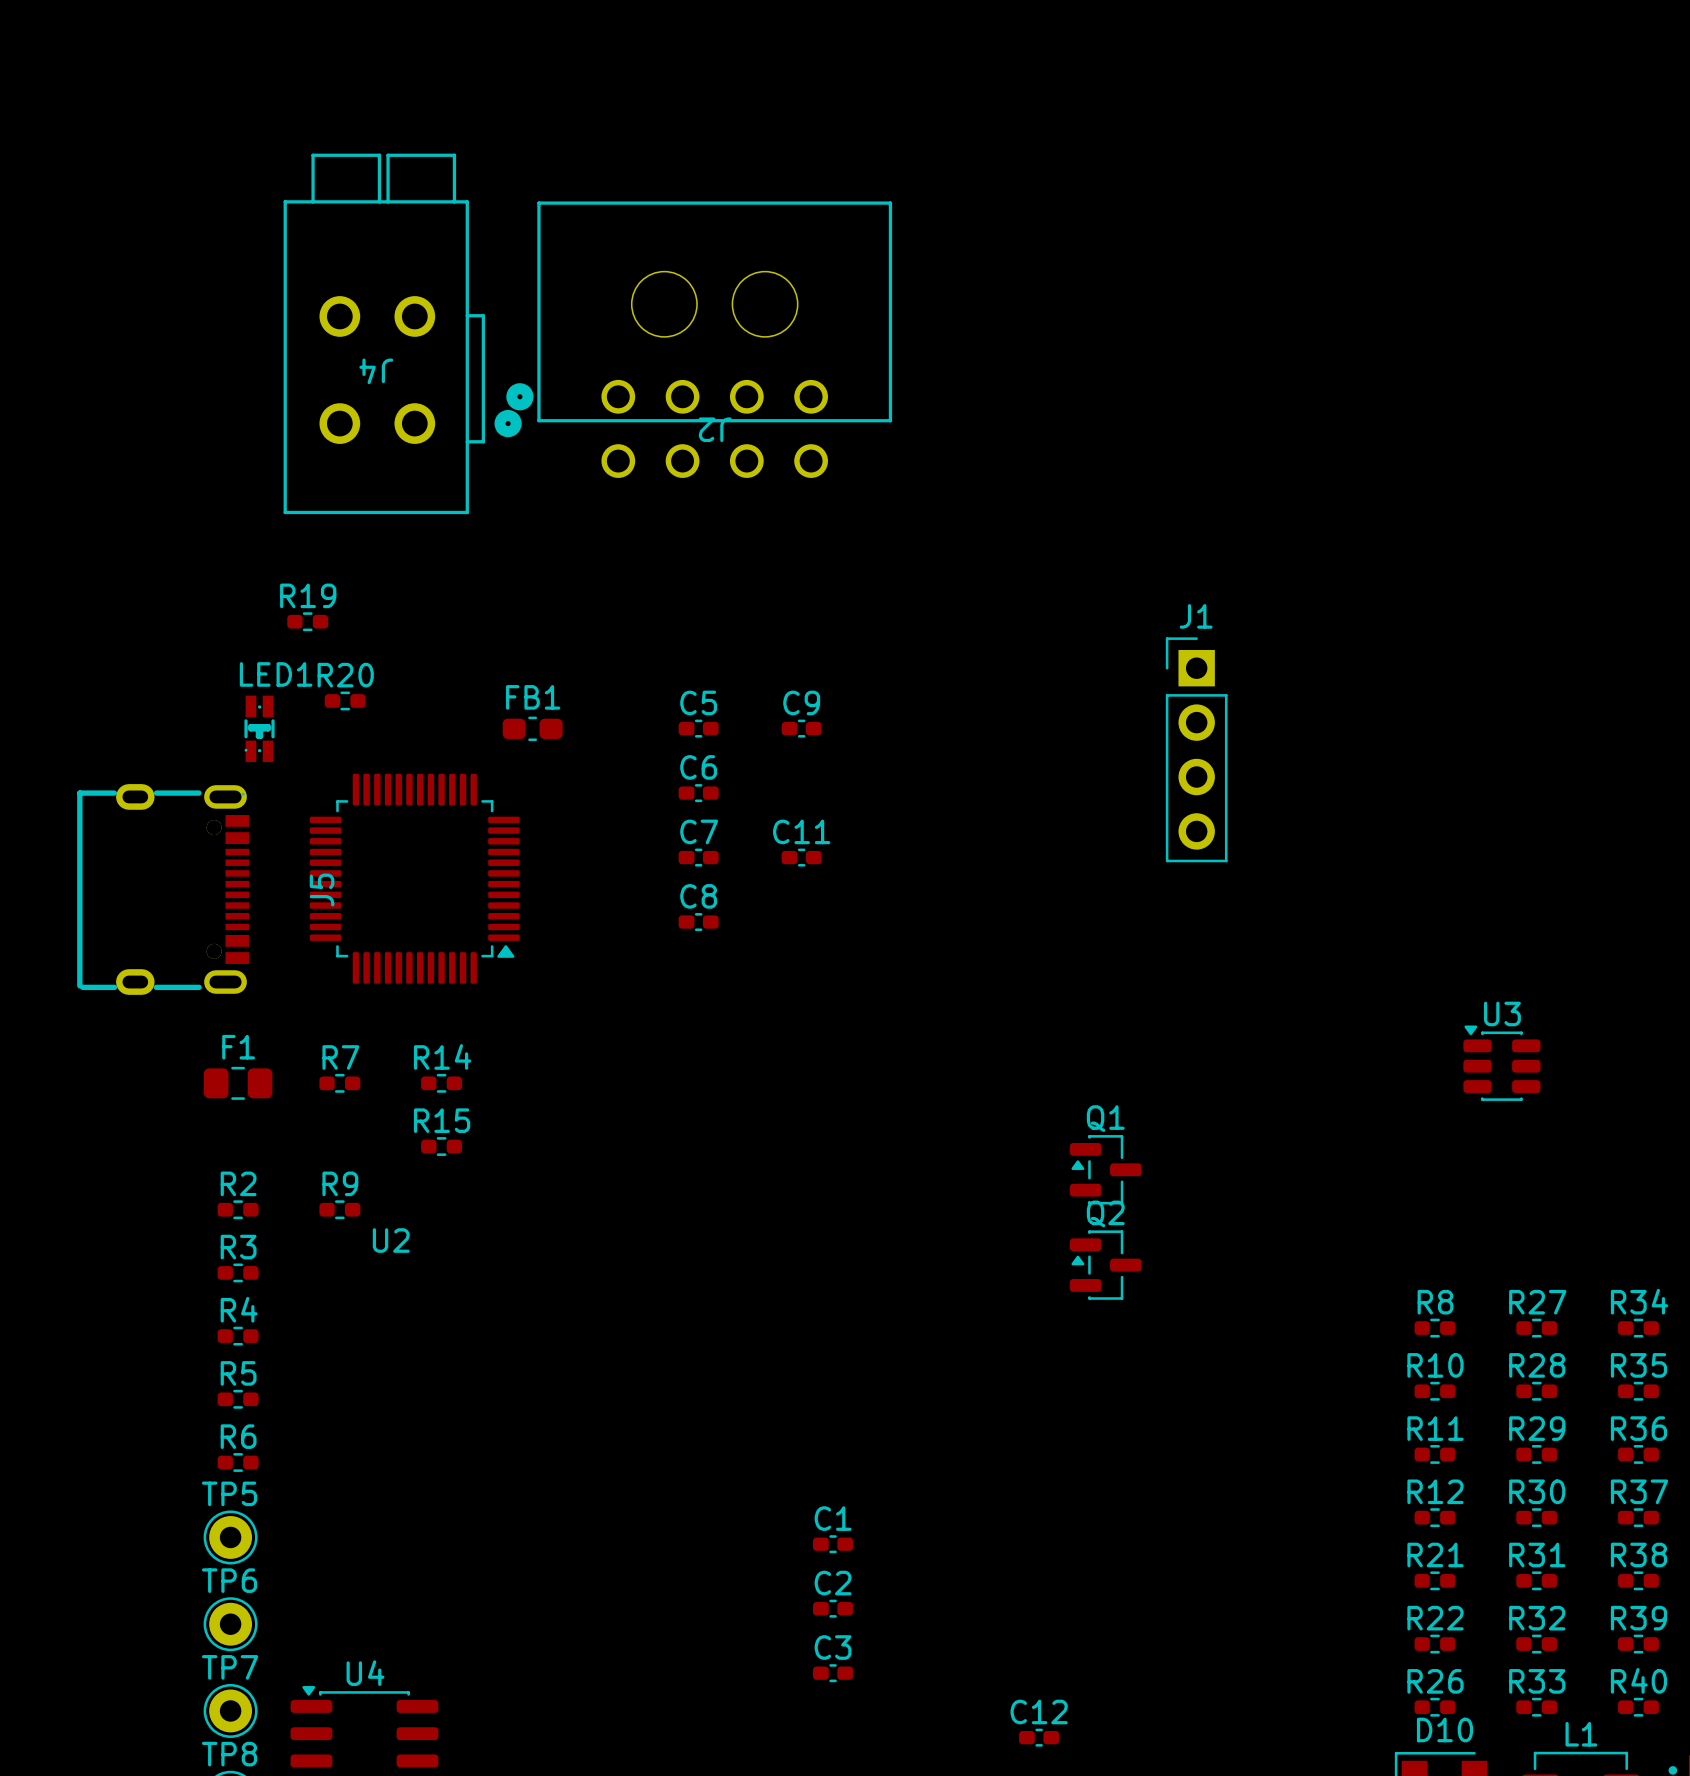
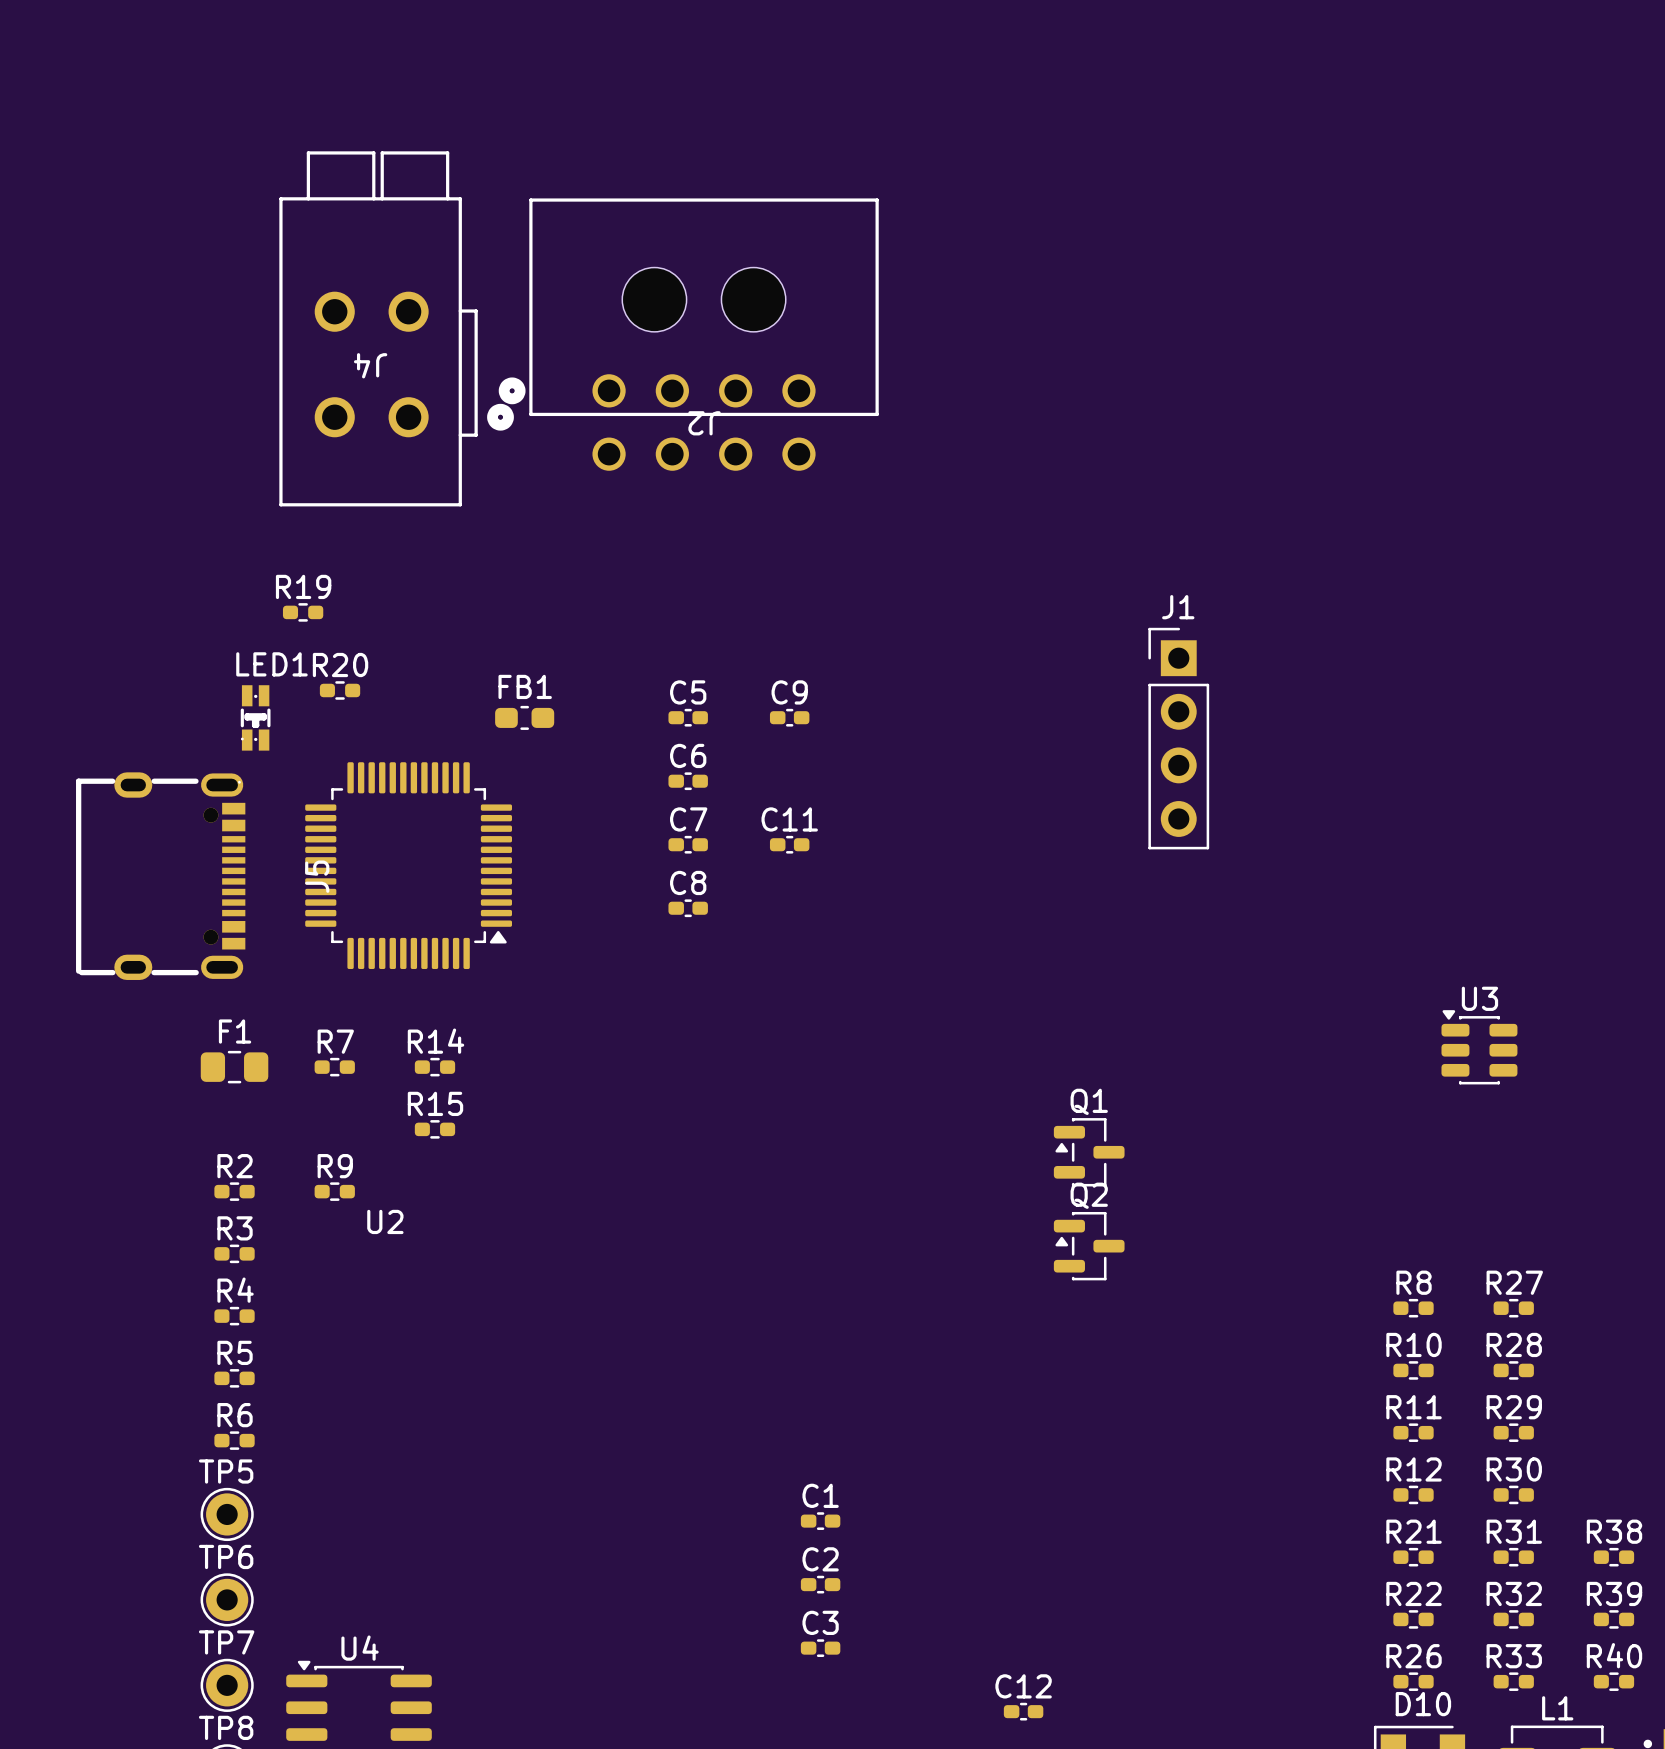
R34: (1638, 1328) -> none
R35: (1638, 1391) -> none
R36: (1638, 1454) -> none
R37: (1638, 1517) -> none

